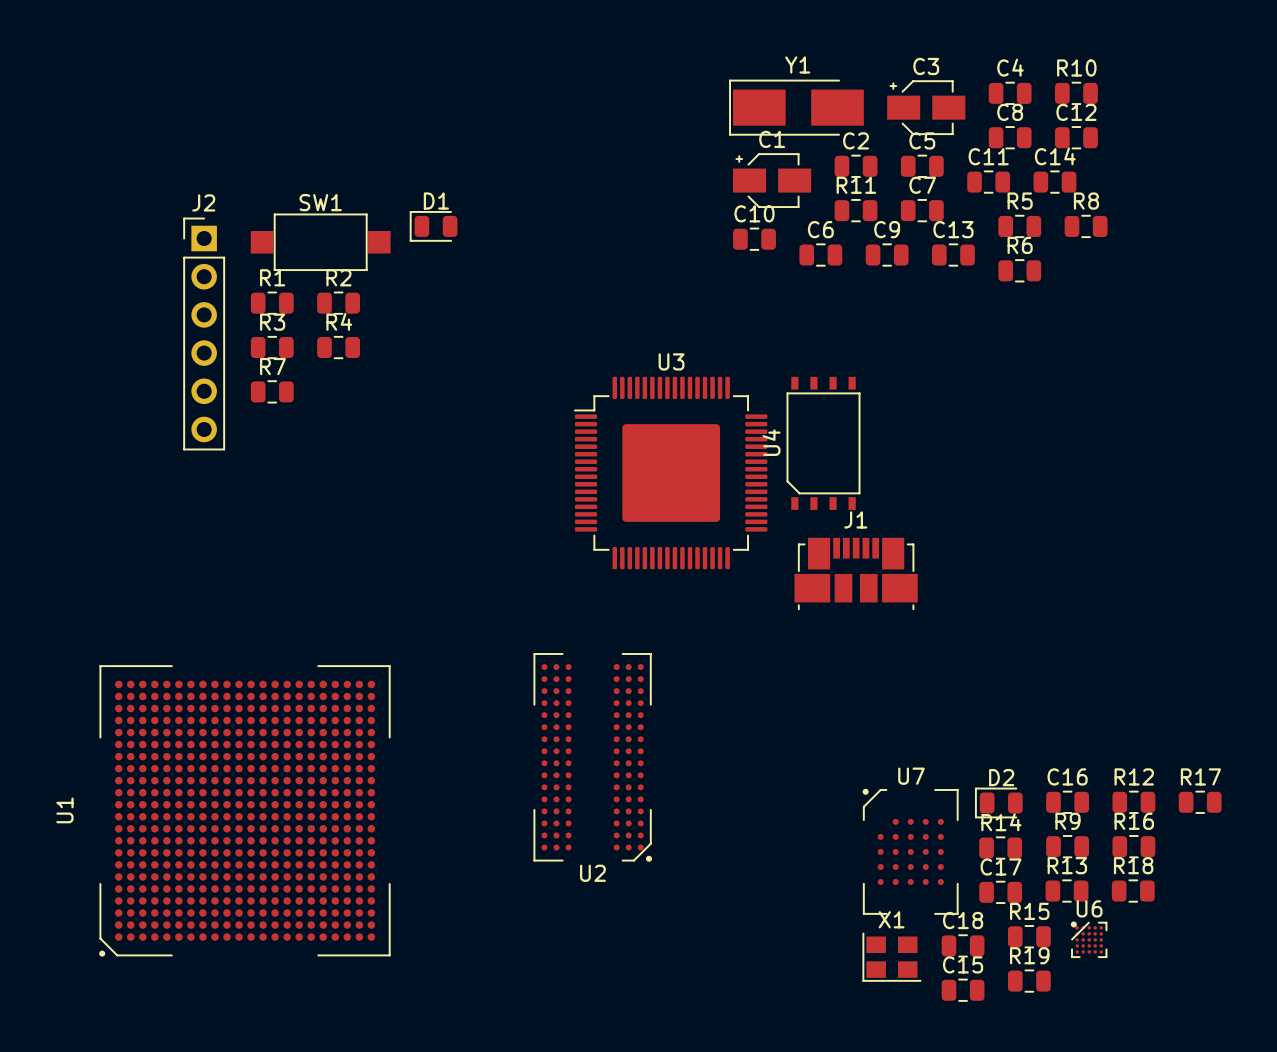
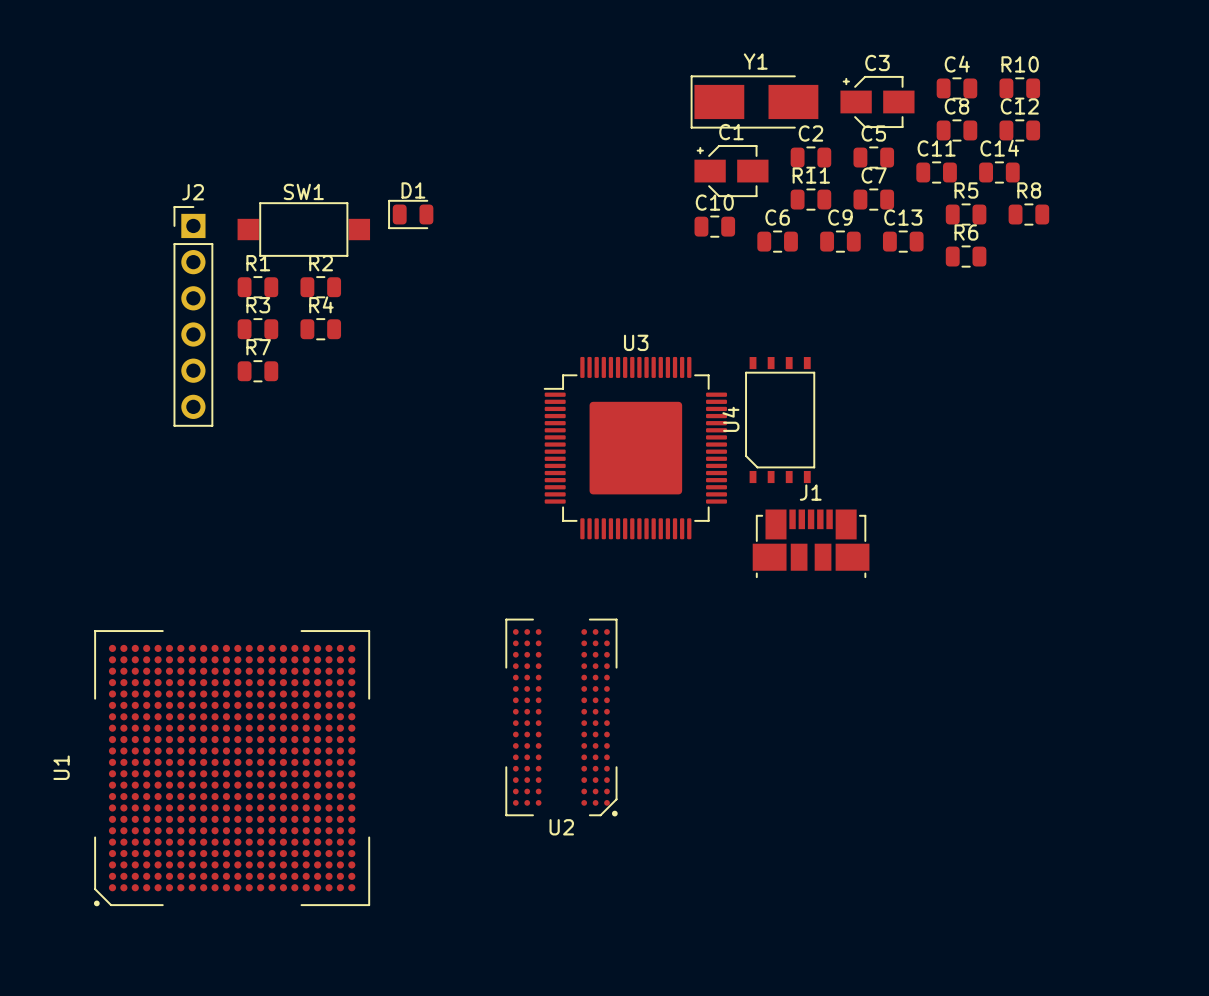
D2: (998, 802) -> none
C16: (1067, 802) -> none
R12: (1133, 802) -> none
R17: (1200, 802) -> none
R9: (1067, 846) -> none
R16: (1133, 846) -> none
R14: (1000, 848) -> none
U7: (910, 851) -> none
R13: (1066, 891) -> none
R18: (1133, 891) -> none
C17: (1000, 892) -> none
R15: (1029, 936) -> none
U6: (1089, 939) -> none
C18: (963, 945) -> none
X1: (891, 957) -> none
R19: (1029, 981) -> none
C15: (963, 990) -> none

